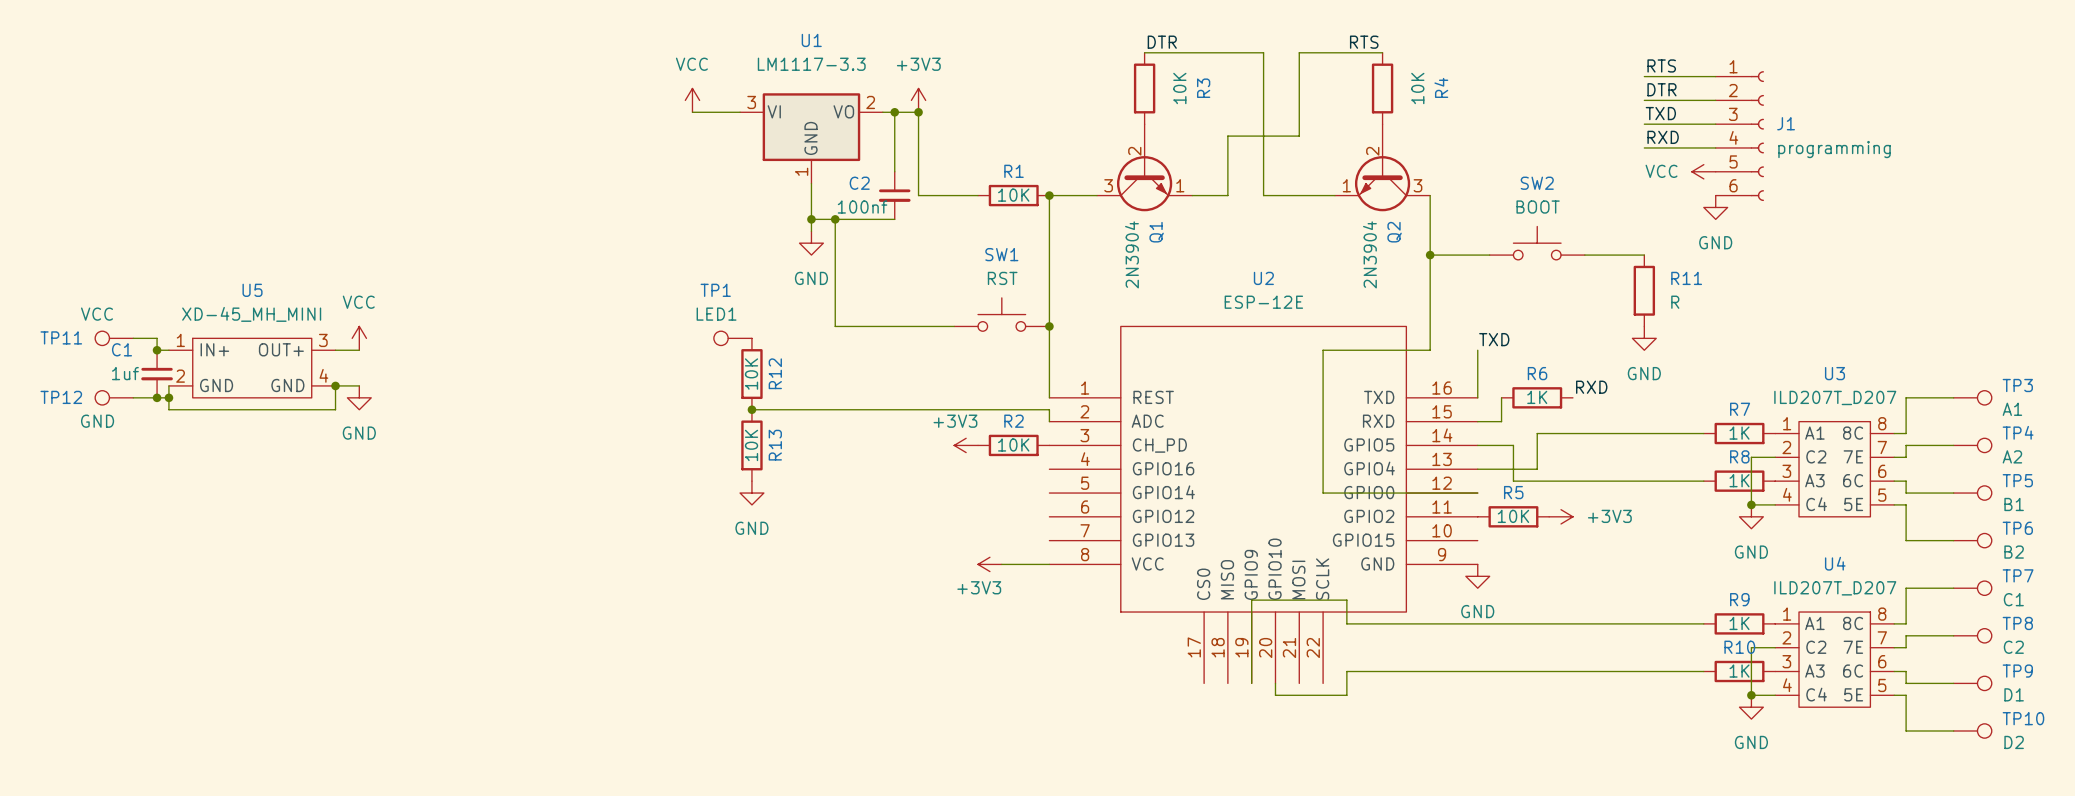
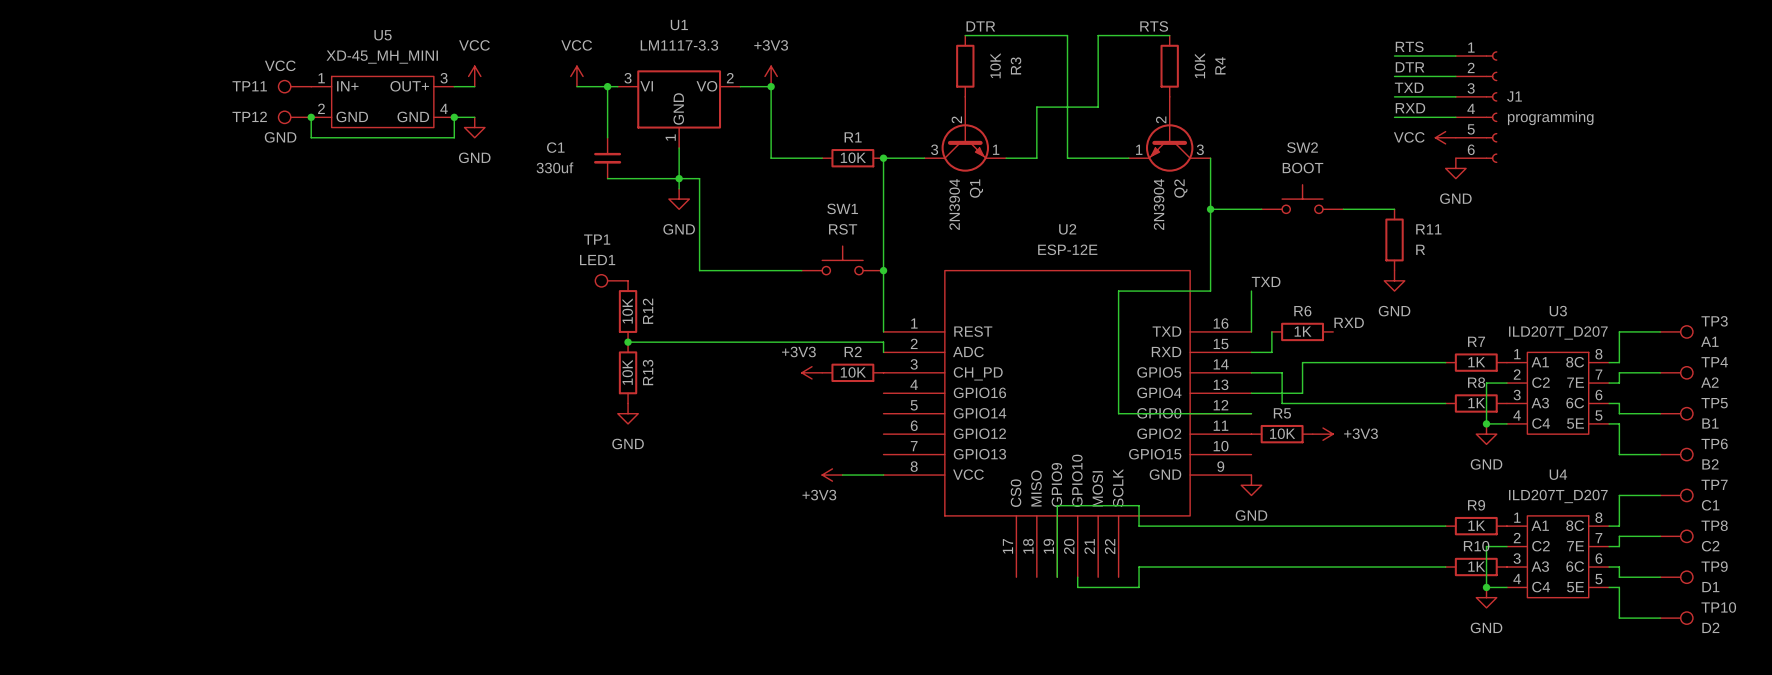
power symbol: none -> VCC (474, 76)
wire: none -> (454, 86) (474, 86)
junction: none -> (607, 86)
wire: (894, 112) (894, 171) -> (607, 86) (607, 137)
junction: (894, 112) -> none
wire: none -> (311, 117) (311, 137) (454, 137) (454, 117) (474, 117)
junction: none -> (311, 117)
junction: none -> (454, 117)
power symbol: none -> GND (474, 127)
C2: 100nf (894, 195) -> none
wire: none -> (607, 178) (679, 178)
wire: (835, 219) (894, 219) -> none
junction: (835, 219) -> none
TP11 position: (114, 338) -> (294, 86)
wire: (133, 338) (157, 338) (157, 350) (168, 350) -> none
power symbol: VCC (359, 338) -> none
C1 name position: C1 (122, 349) -> C1 (555, 147)
junction: (157, 350) -> none
wire: (335, 350) (359, 350) -> none
U5 position: (252, 368) -> (382, 101)
C1 value: 1uf (125, 373) -> 330uf (554, 167)
C1 position: (157, 374) -> (607, 158)
wire: (168, 385) (168, 409) (335, 409) (335, 385) (359, 385) -> none
junction: (335, 385) -> none
TP12 position: (114, 397) -> (294, 117)
wire: (133, 397) (168, 397) -> none
junction: (157, 397) -> none
junction: (168, 397) -> none
power symbol: GND (359, 397) -> none

